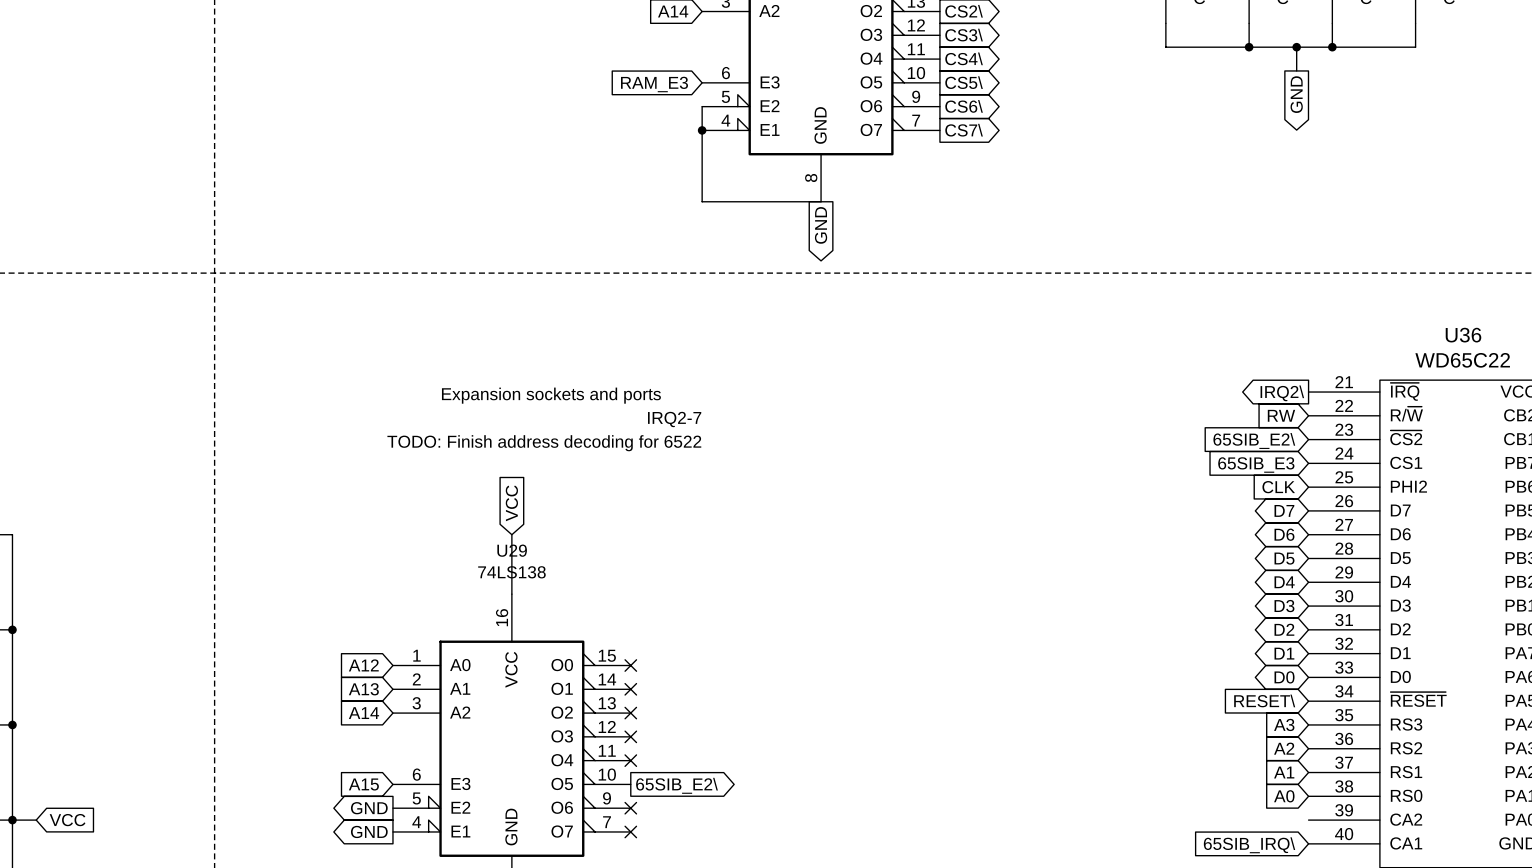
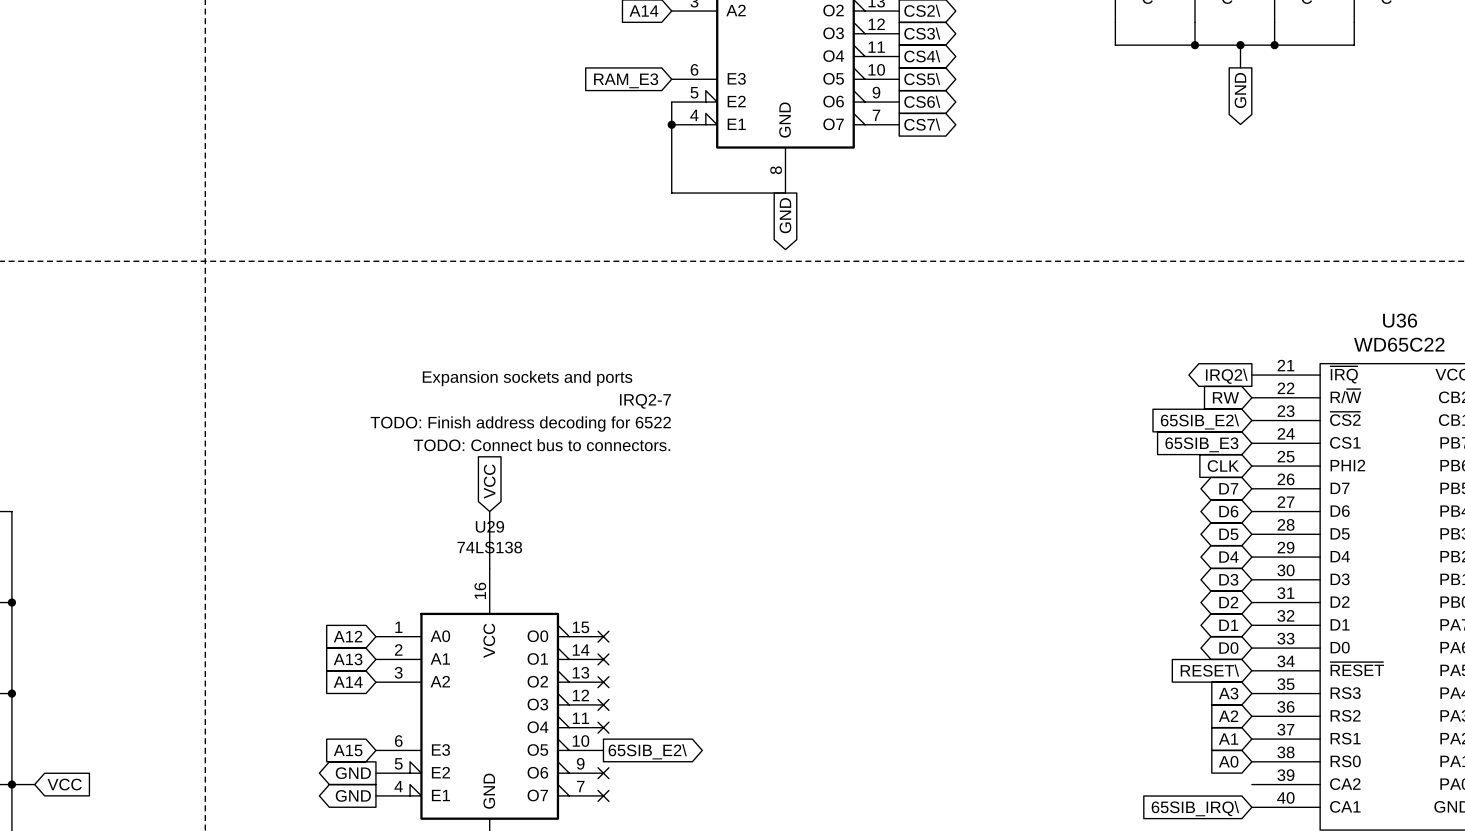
text: none -> TODO: Connect bus to connectors. (542, 445)

